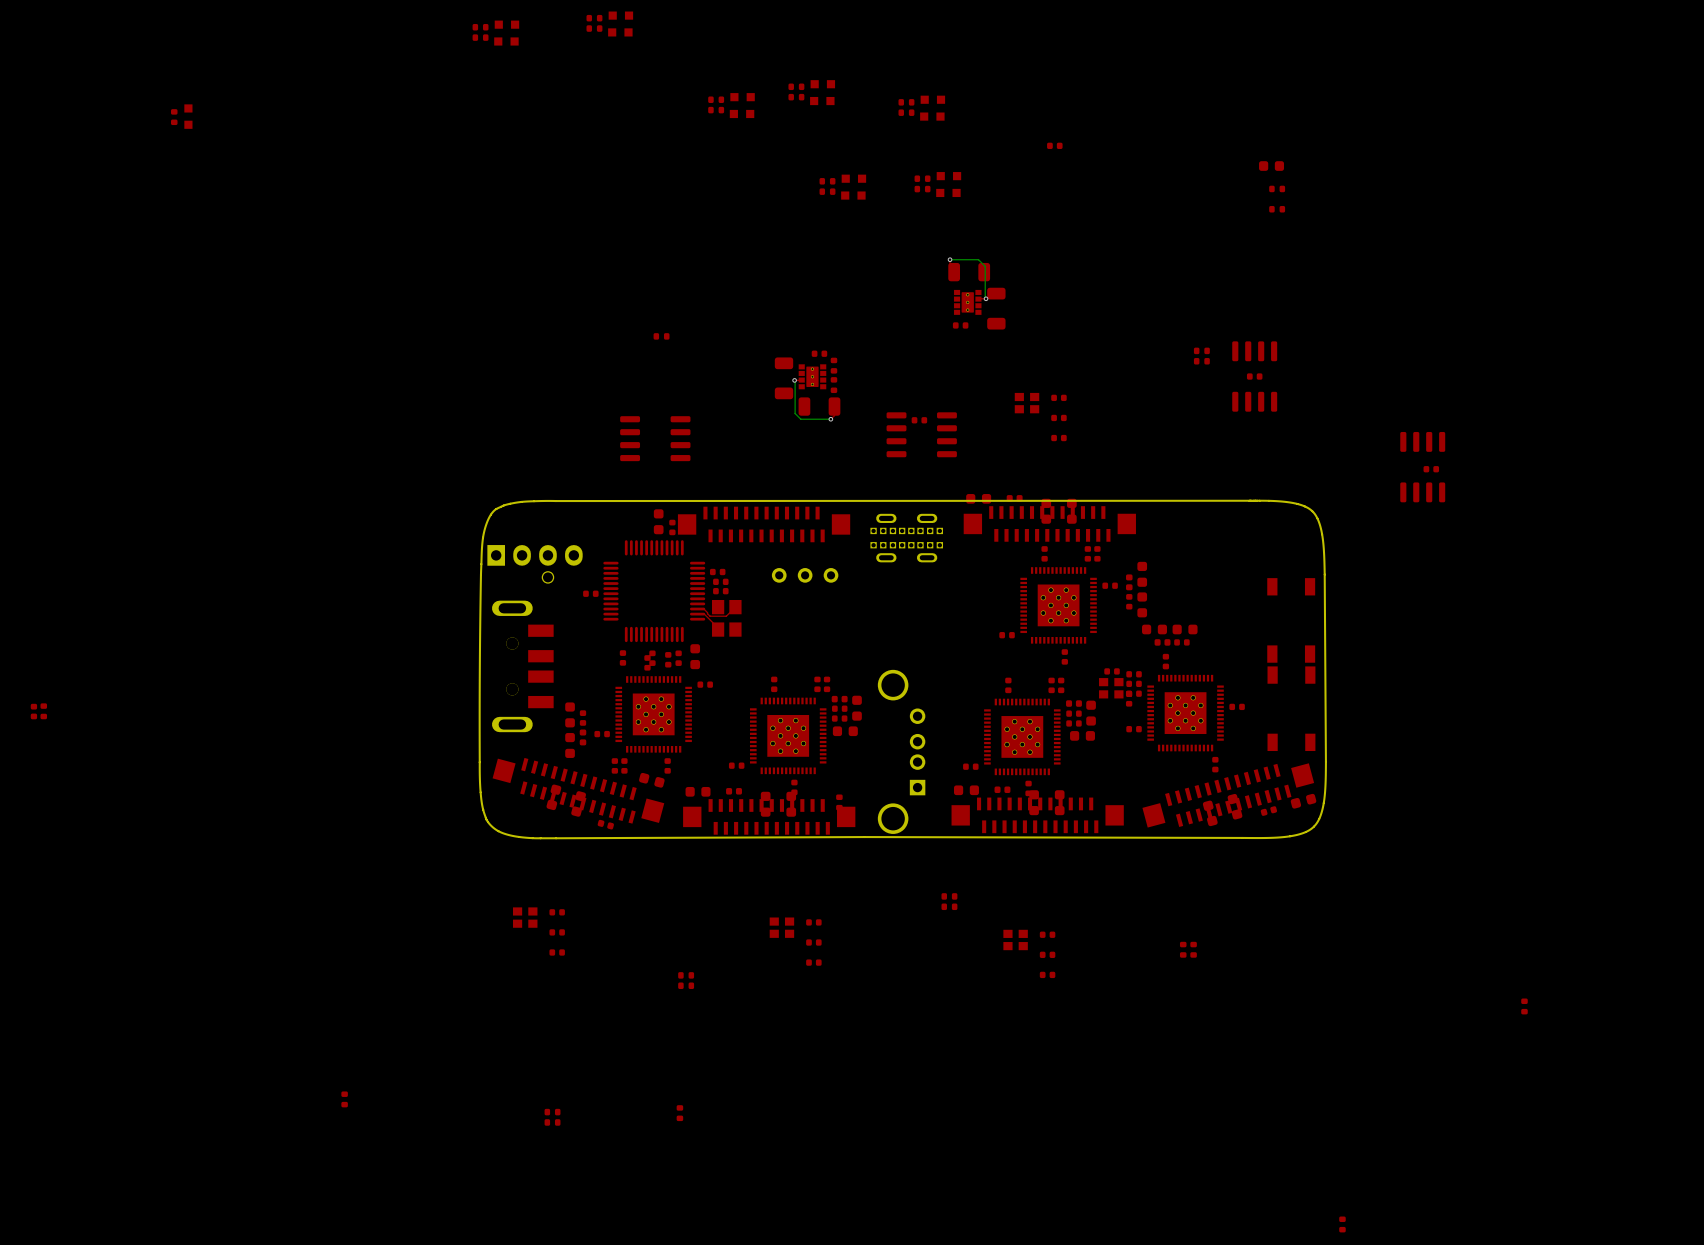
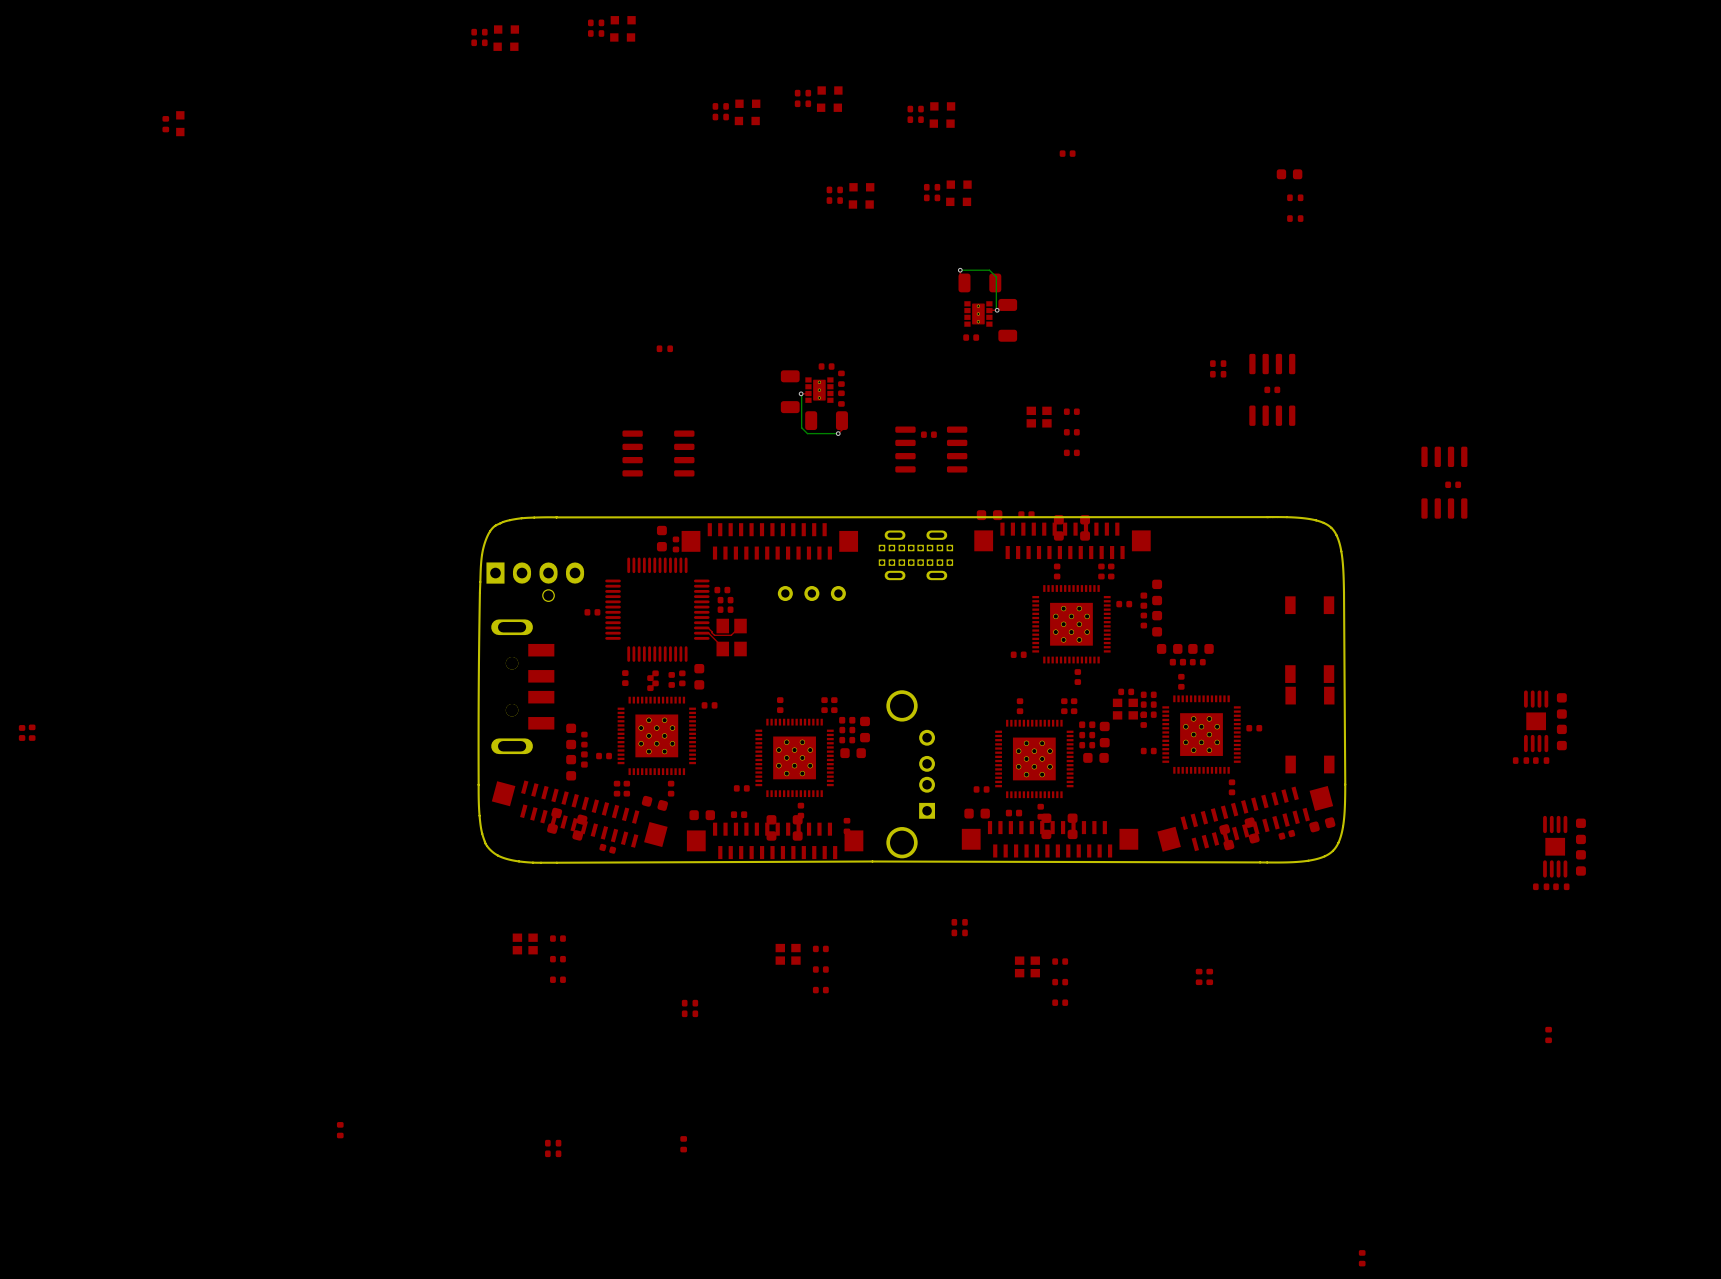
part: none -> (1561, 705)
part: none -> (1536, 721)
part: none -> (1561, 737)
part: none -> (1521, 760)
part: none -> (1541, 760)
part: none -> (1580, 831)
part: none -> (1555, 846)
part: none -> (1580, 862)
part: none -> (1541, 886)
part: none -> (1561, 886)

